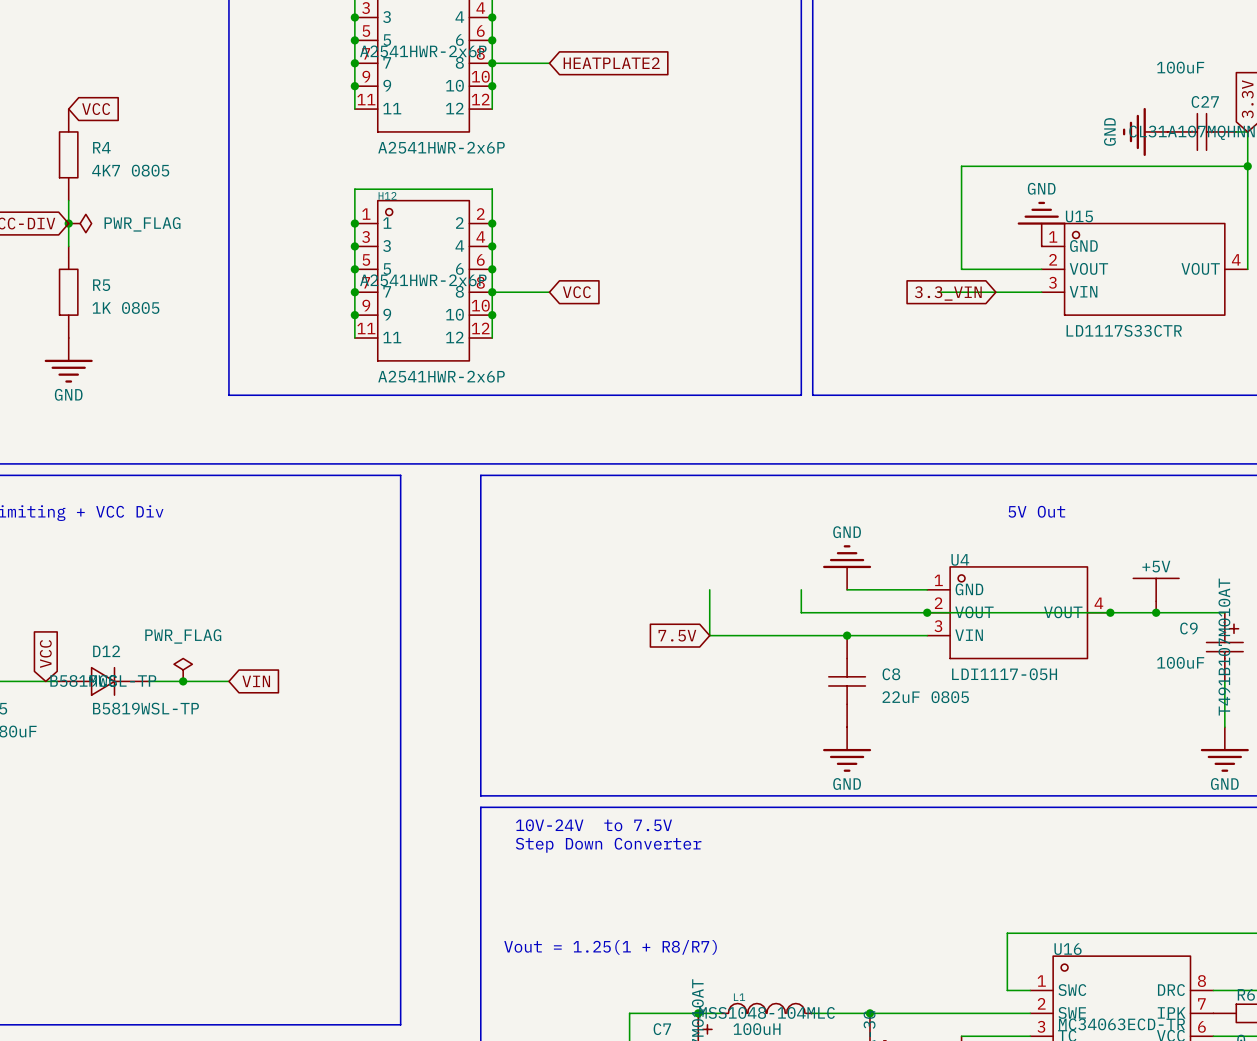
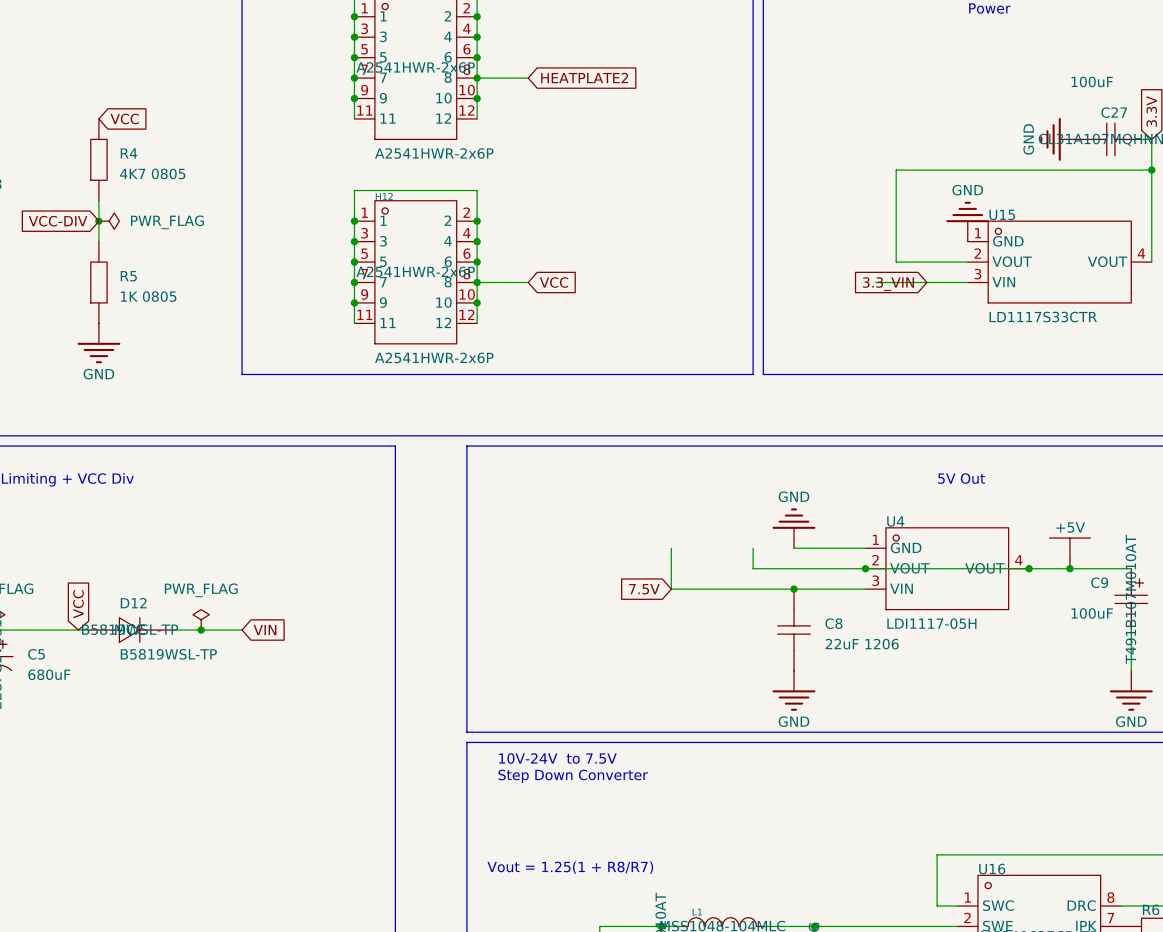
C8 value: 22uF 0805 (925, 697) -> 22uF 1206 (862, 644)

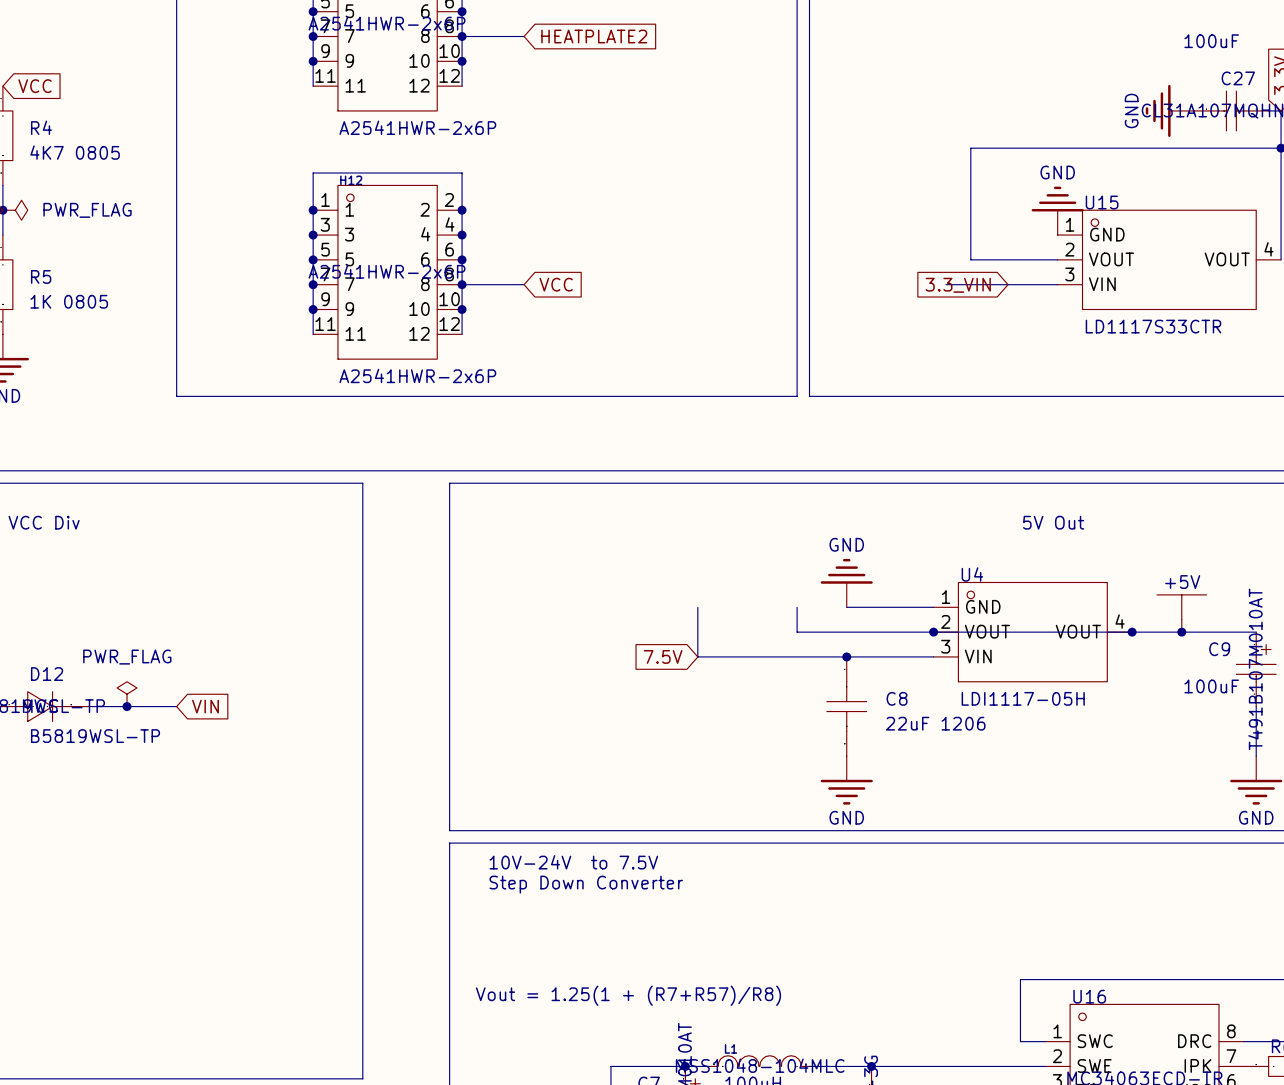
text: Vout = 1.25(1 + R8/R7) (570, 867) -> Vout = 1.25(1 + (R7+R57)/R8) (628, 995)

